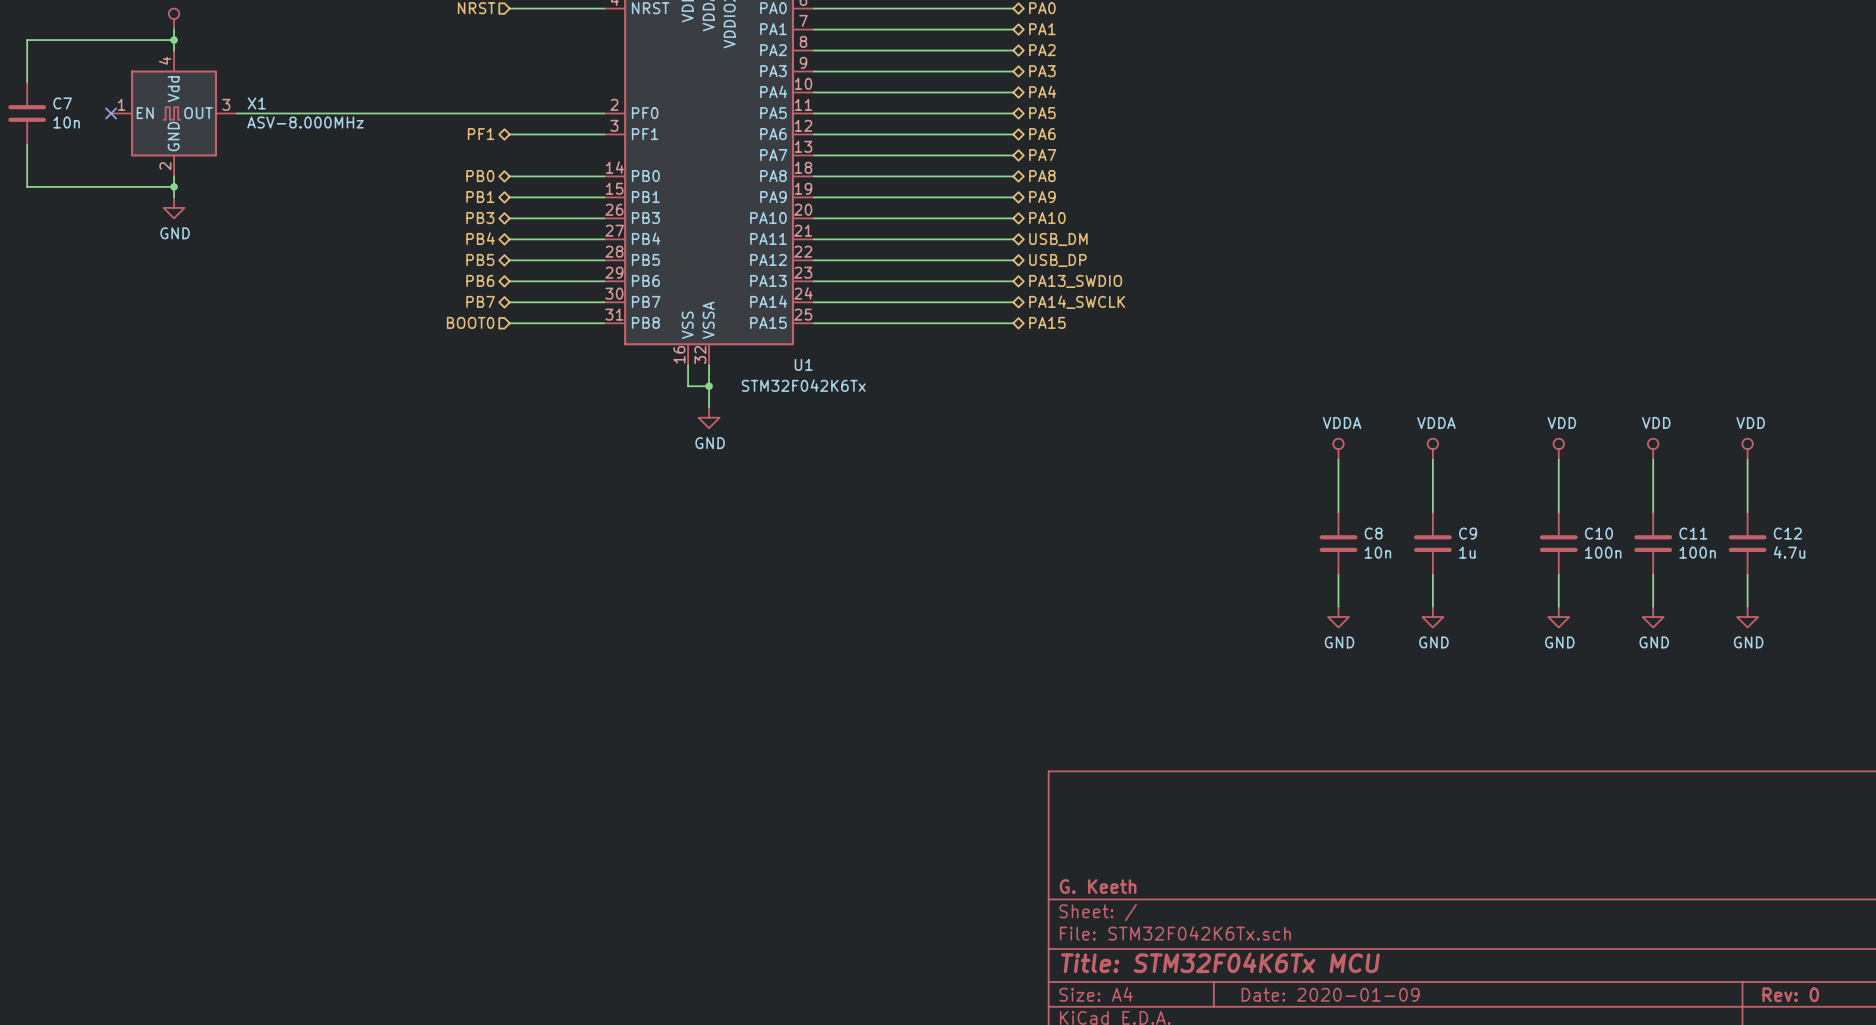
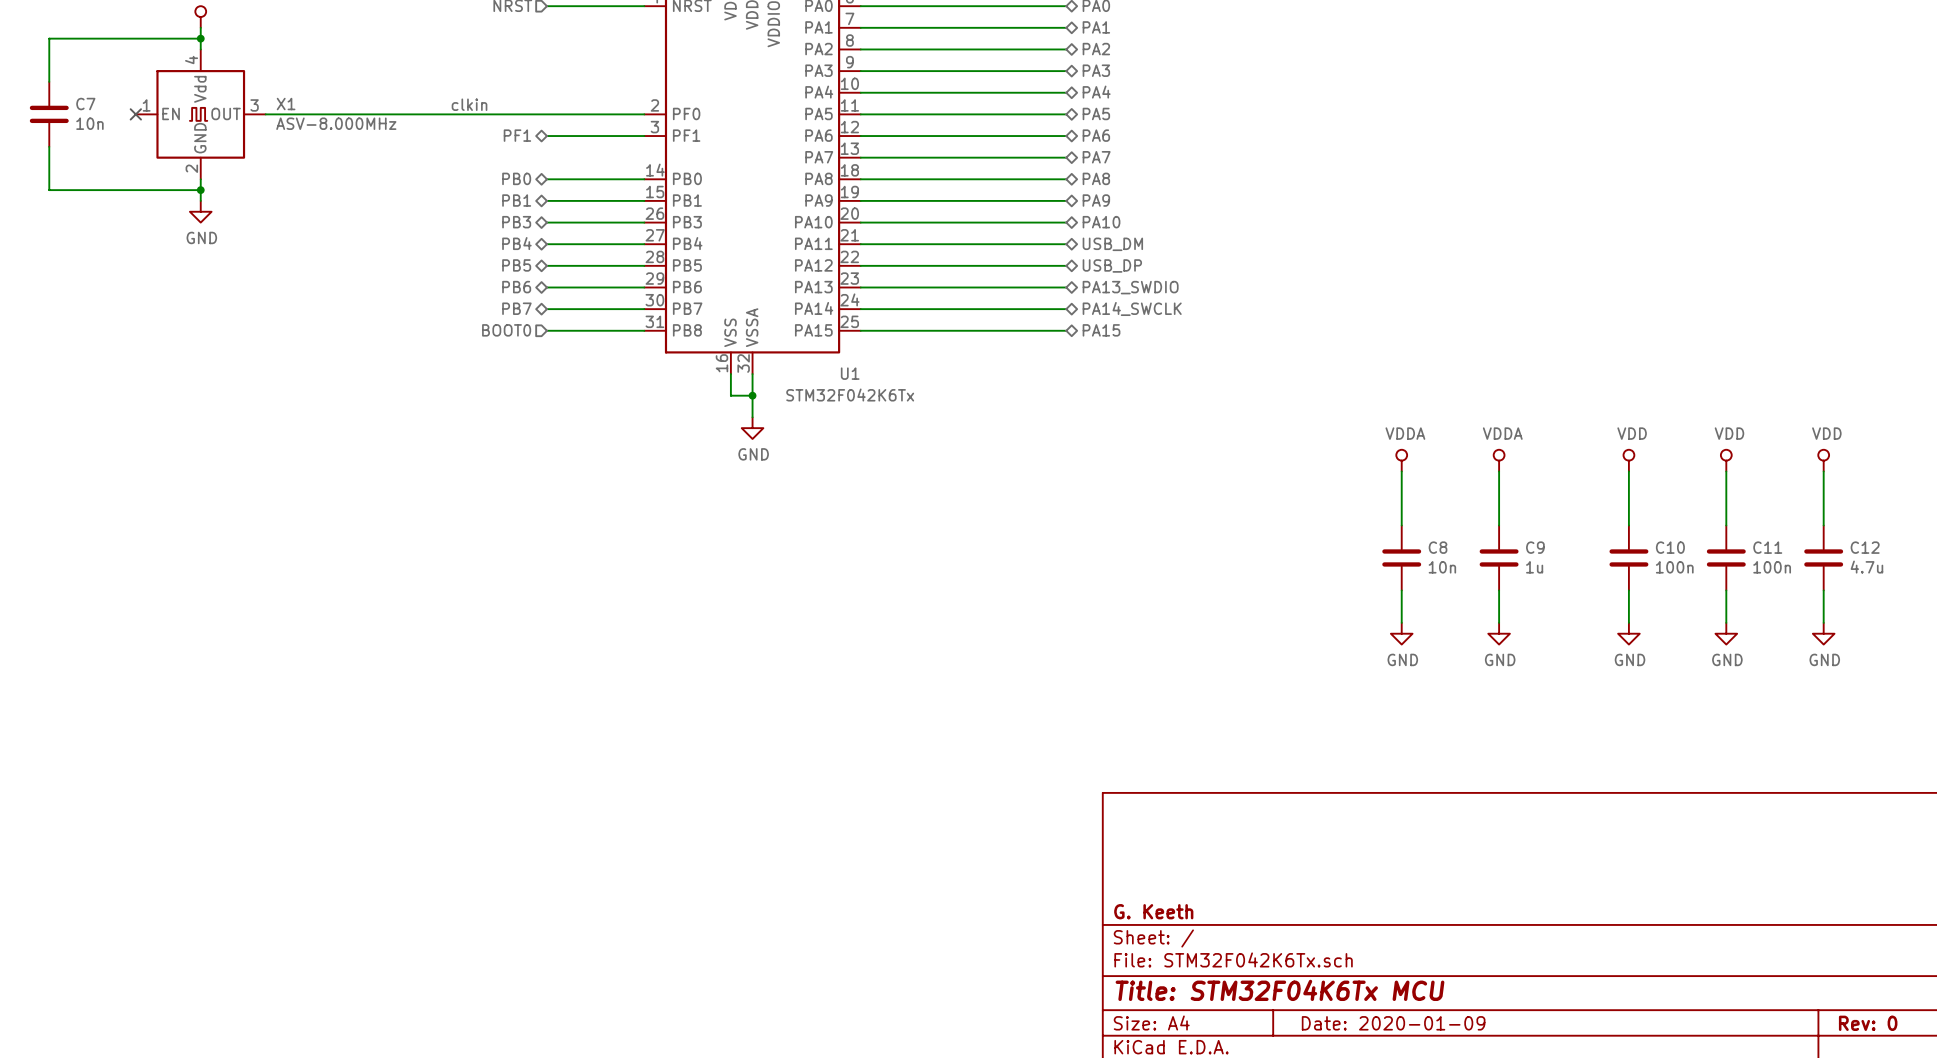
label: none -> clkin (469, 104)

